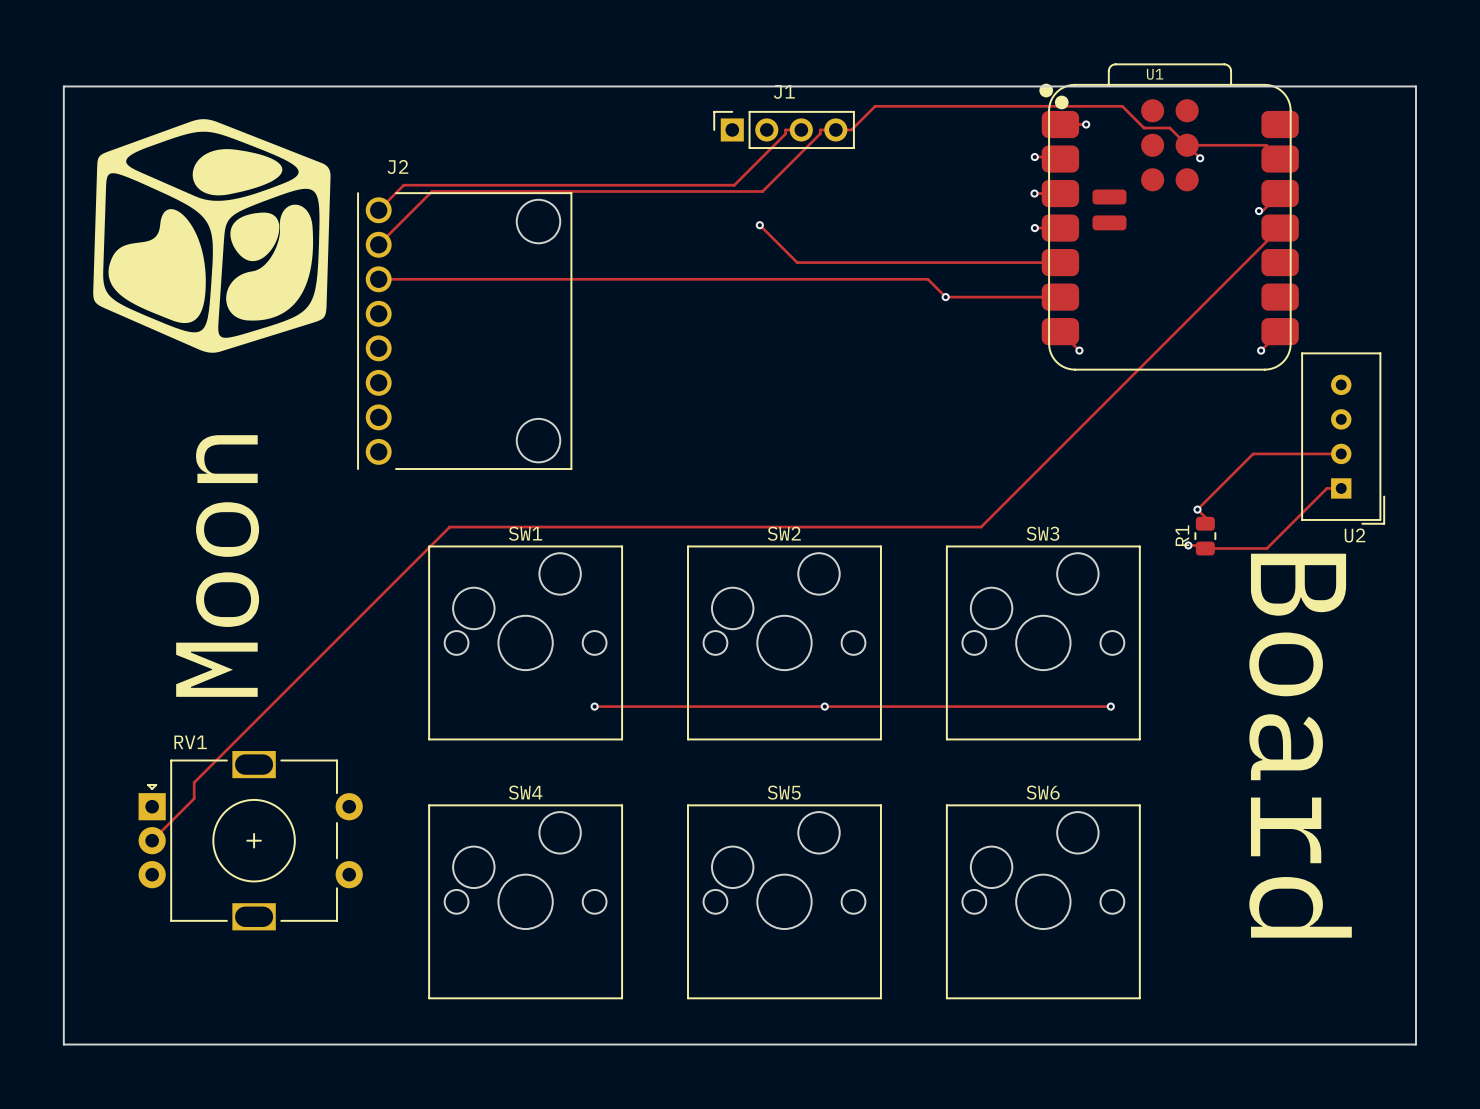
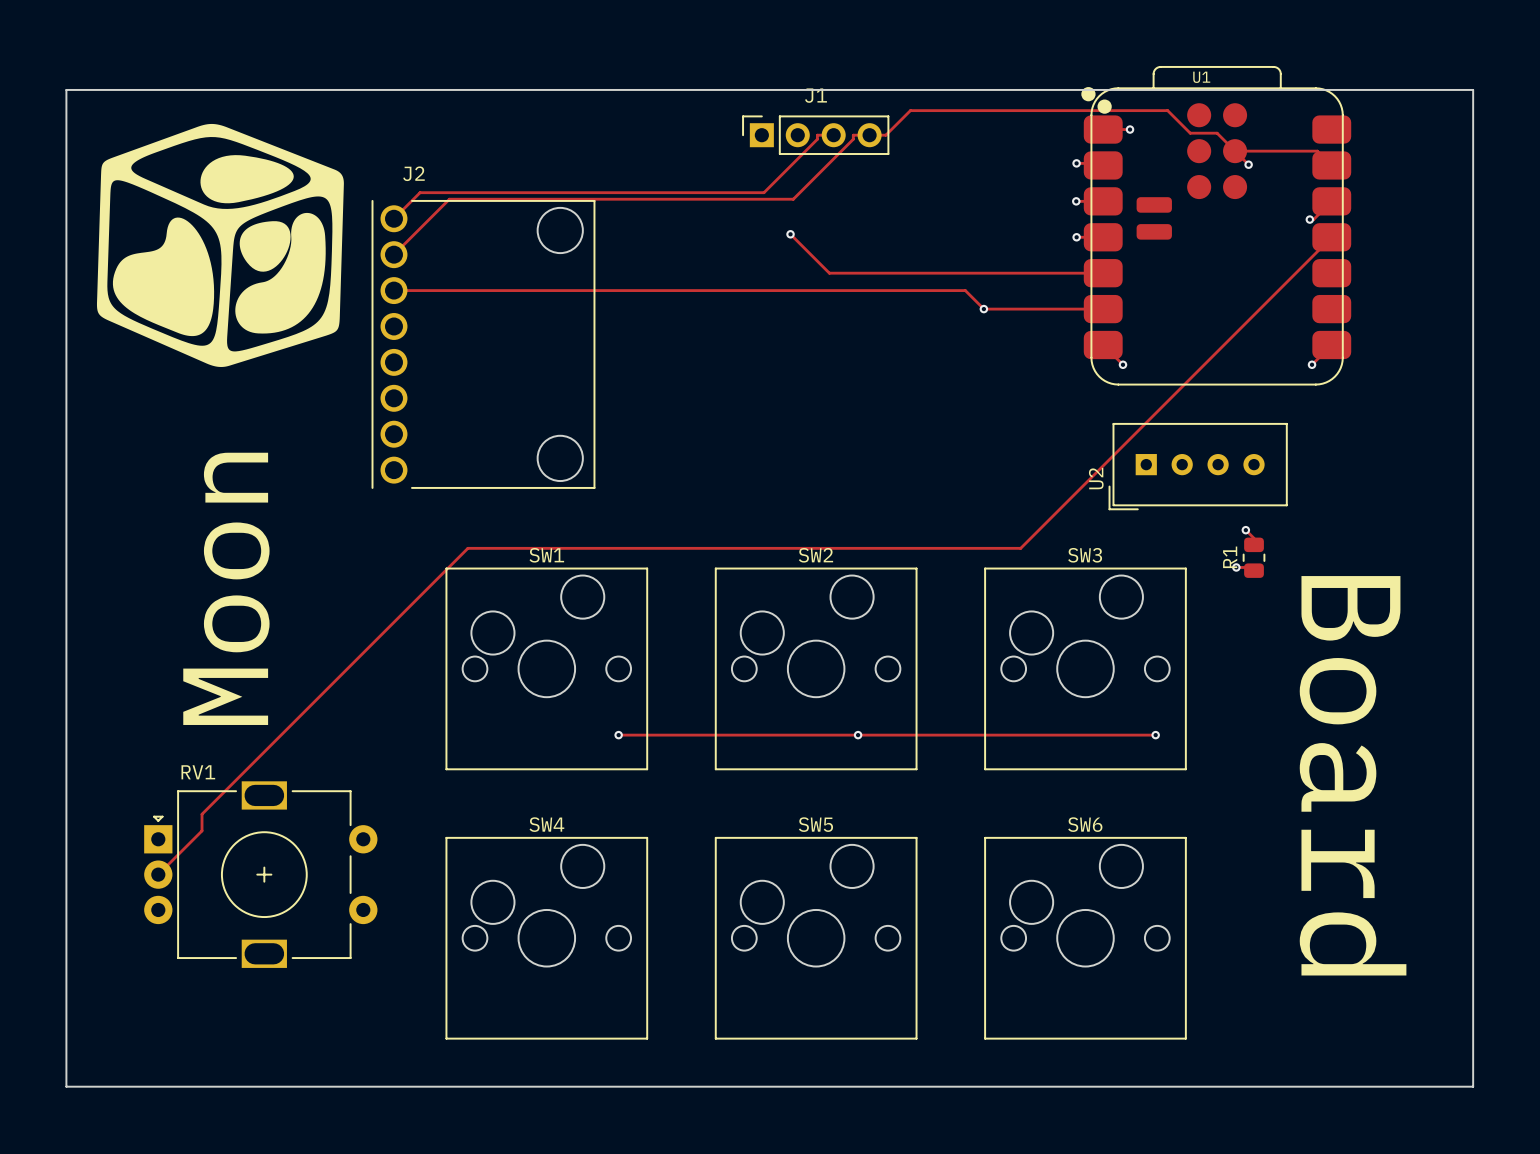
U2 rotation: 0° (1343, 438) -> 90° clockwise (1198, 466)
U2 position: (1343, 438) -> (1198, 466)
track: (1341, 453) (1253, 453) (1197, 509) (1205, 517) -> (1245, 530) (1254, 538)
track: (1341, 488) (1326, 488) (1266, 548) (1205, 548) -> none

